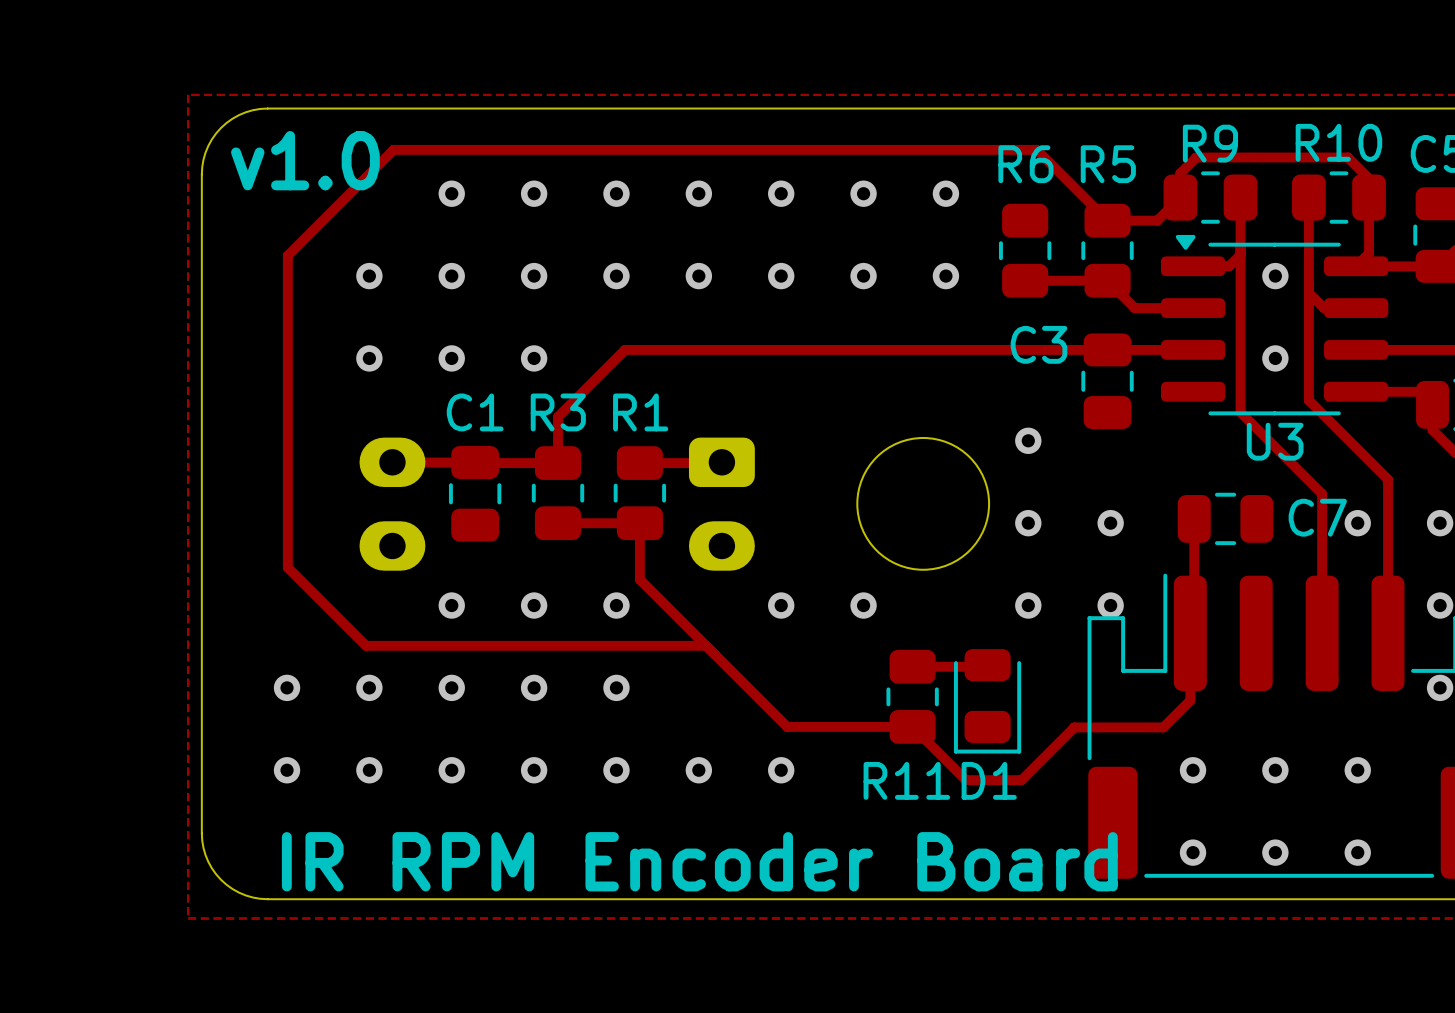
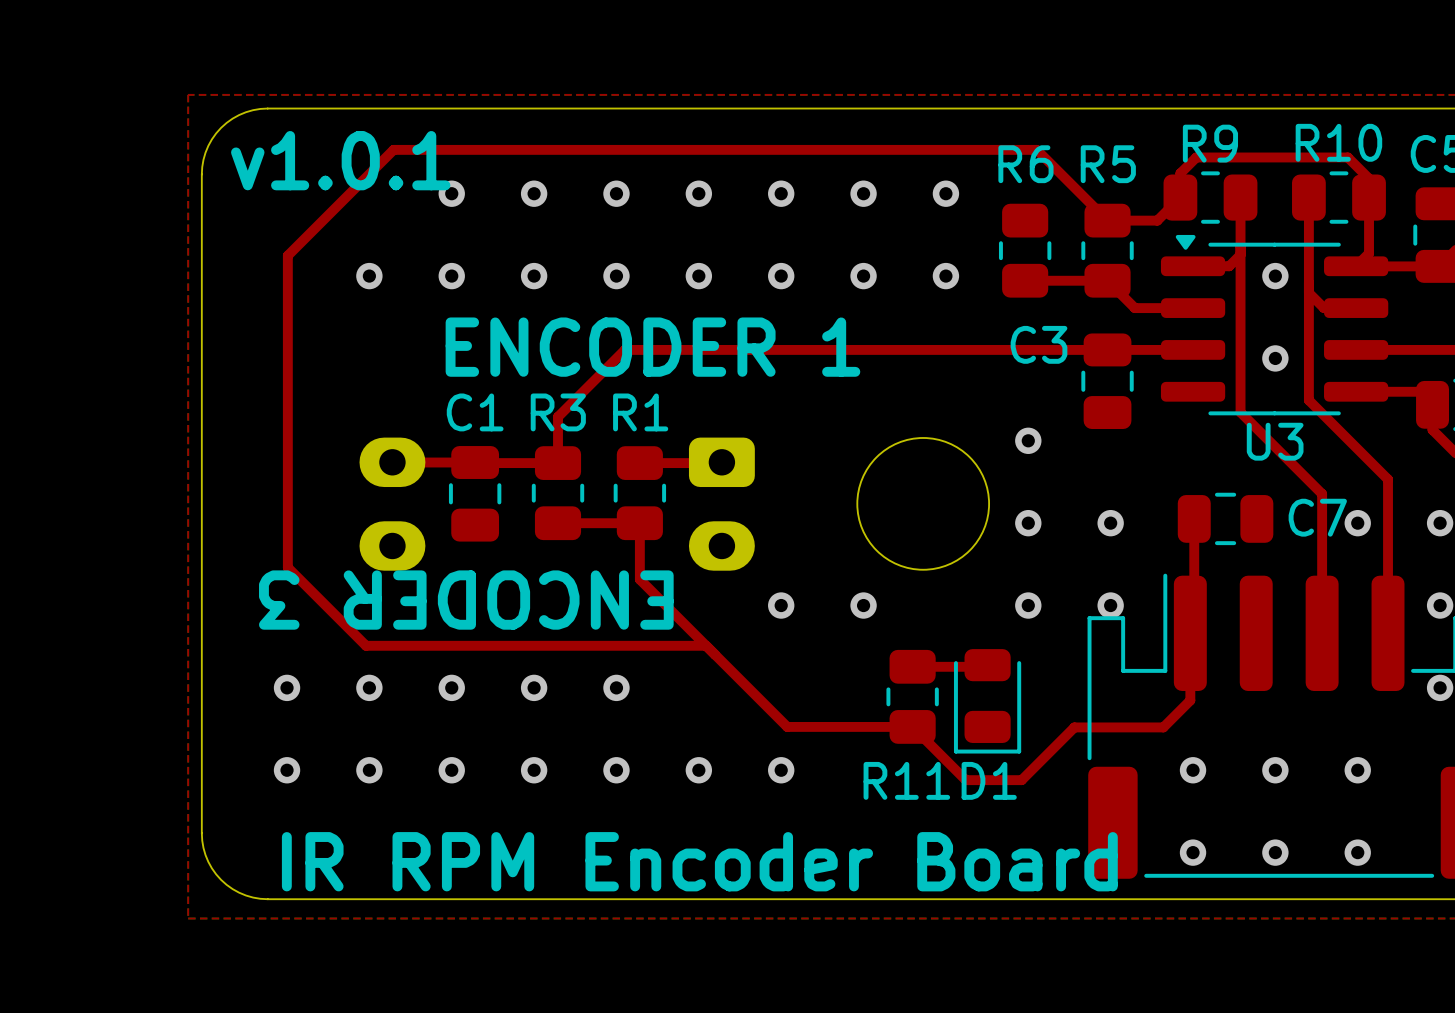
text: v1.0 (305, 160) -> v1.0.1 (340, 160)
text: none -> ENCODER 1 (652, 347)
via: (369, 358) -> none
via: (451, 358) -> none
via: (534, 358) -> none
text: none -> ENCODER 3 (466, 600)
via: (451, 605) -> none
via: (534, 605) -> none
via: (616, 605) -> none

